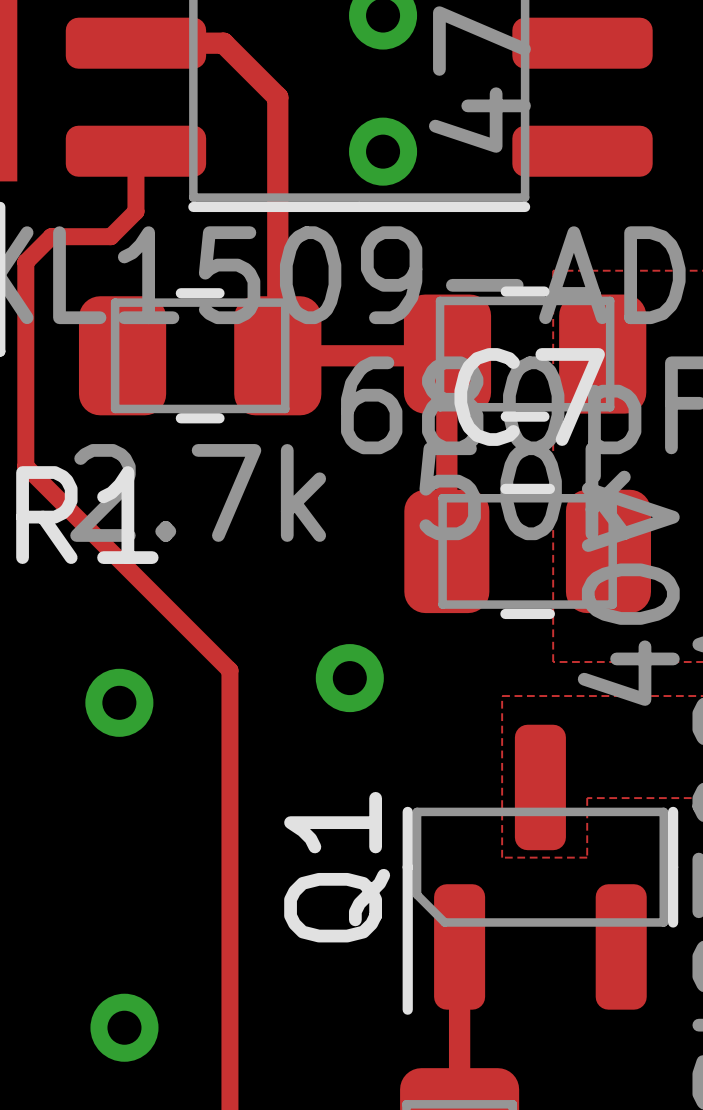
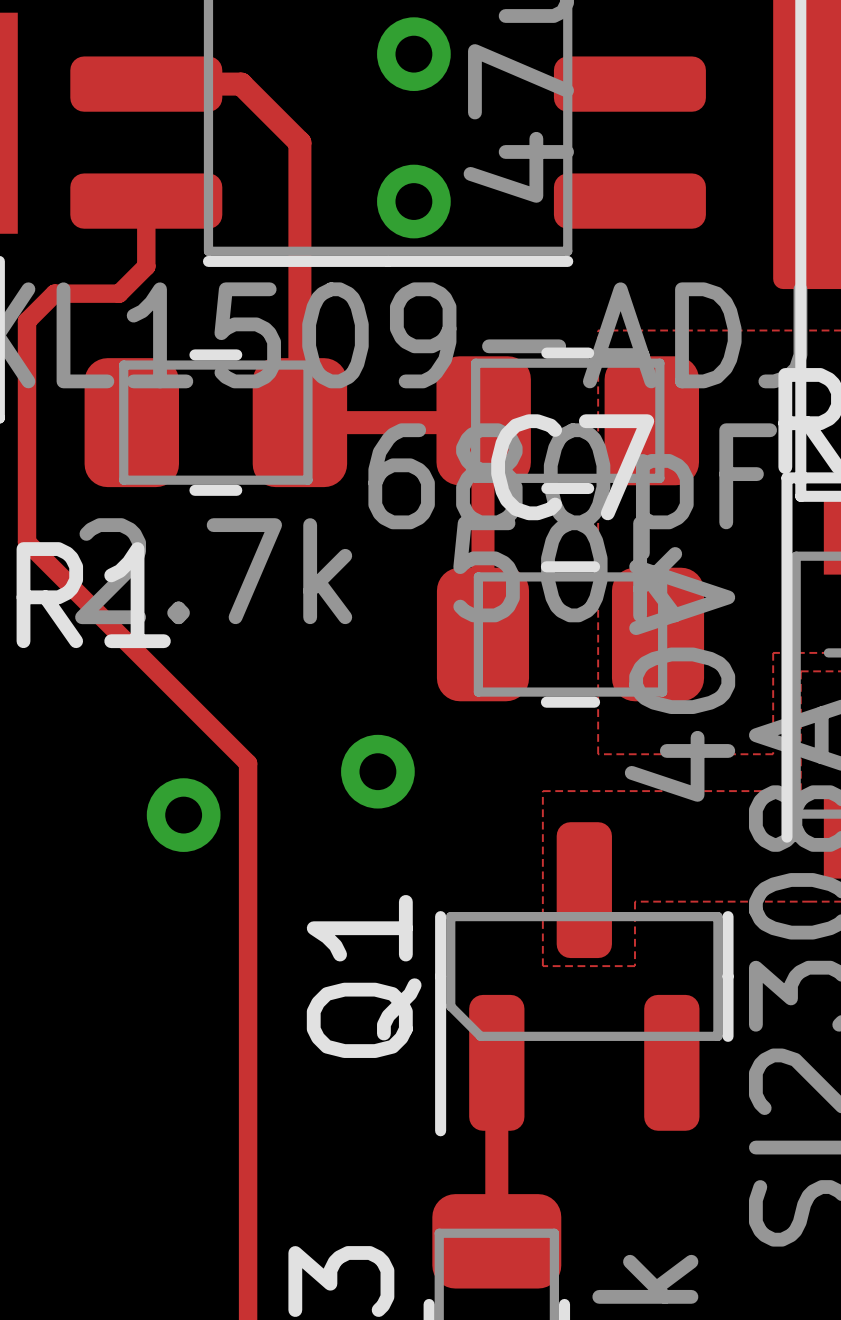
via position: (119, 702) -> (183, 815)
via: (124, 1027) -> none

